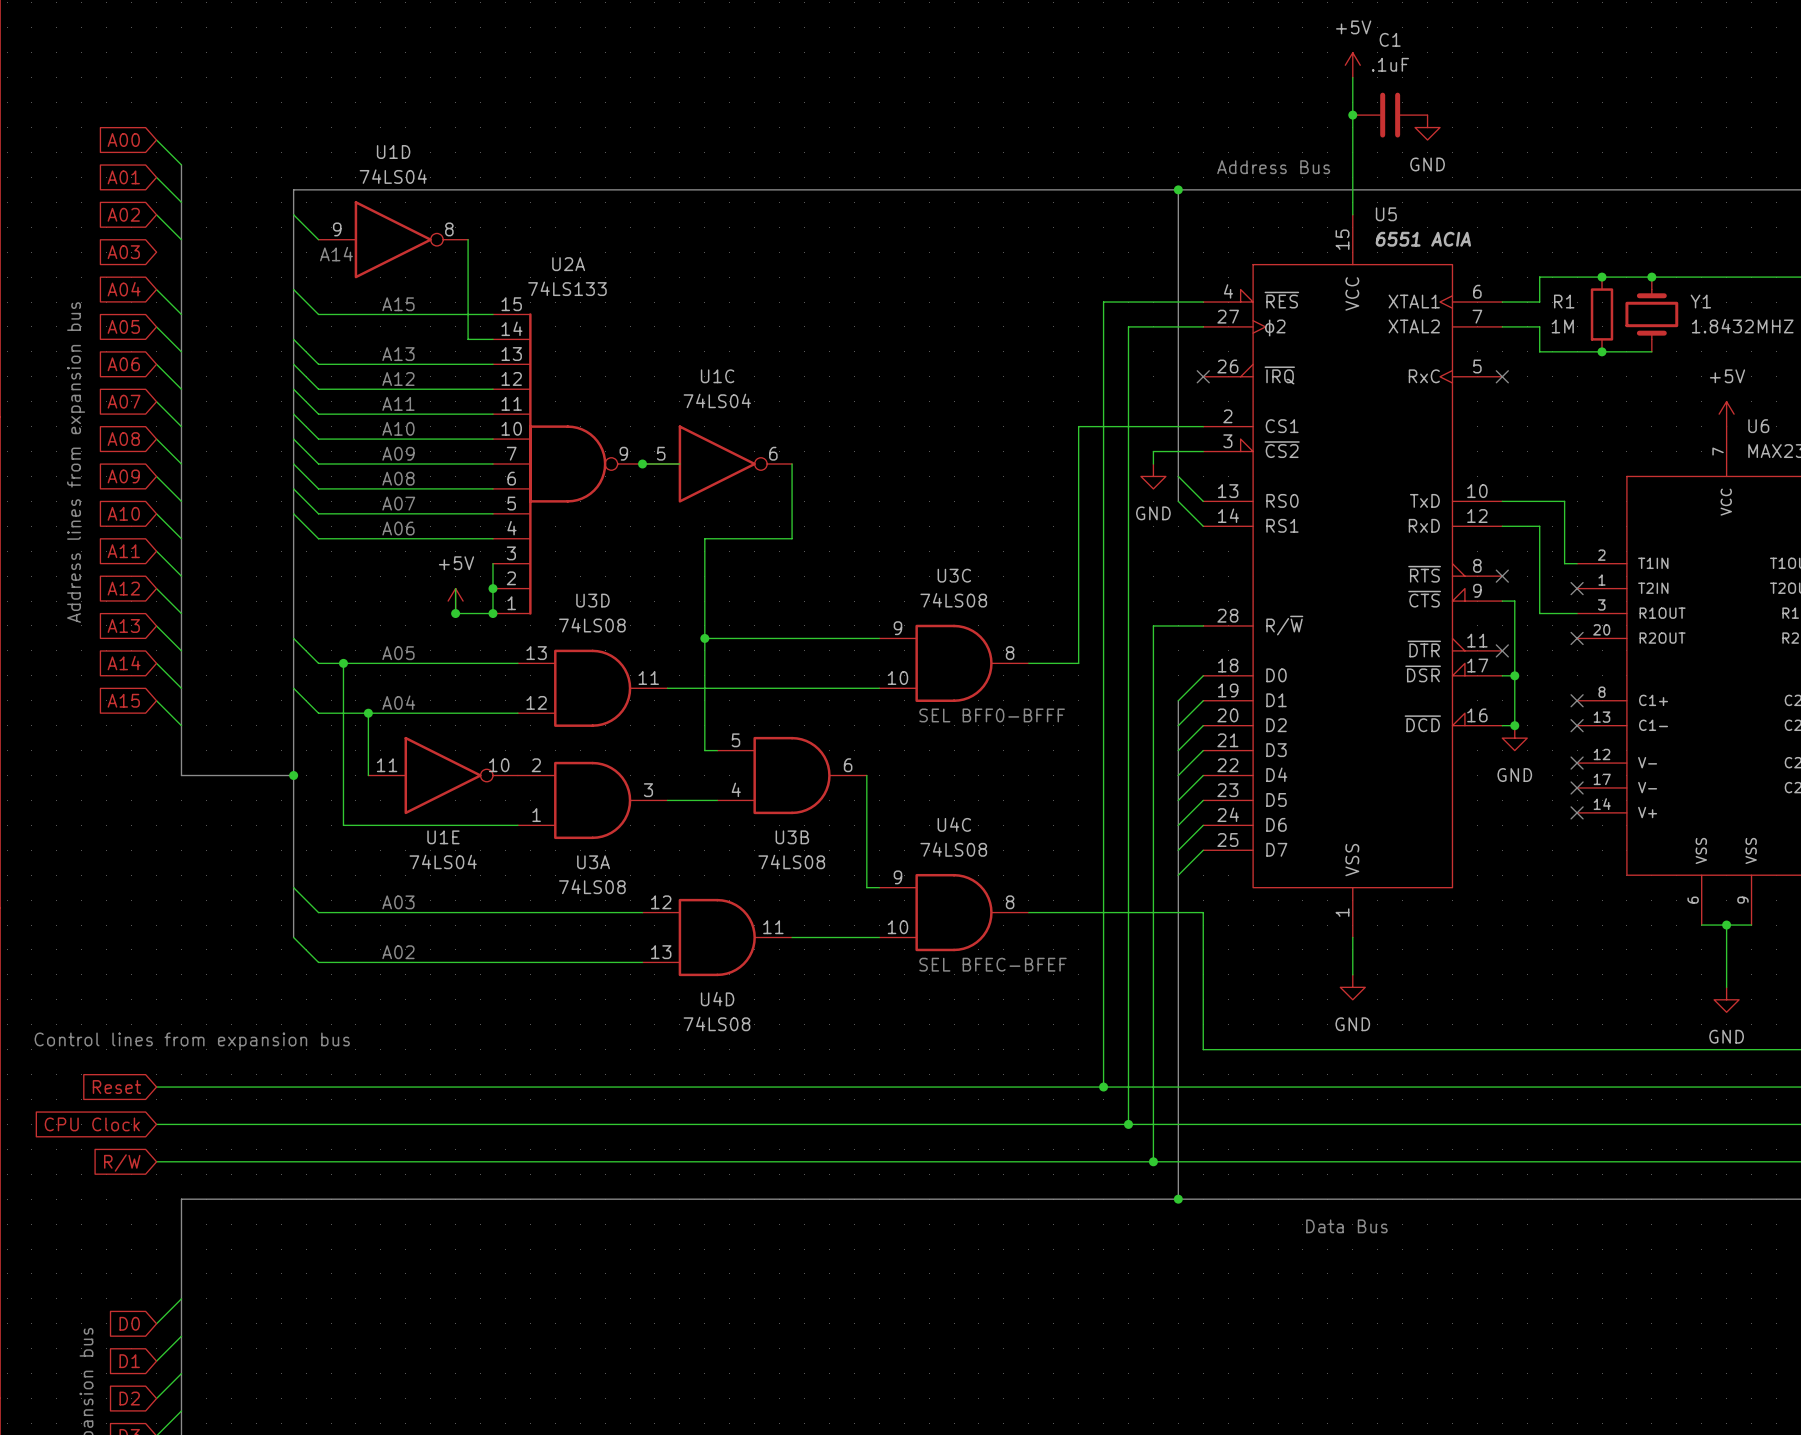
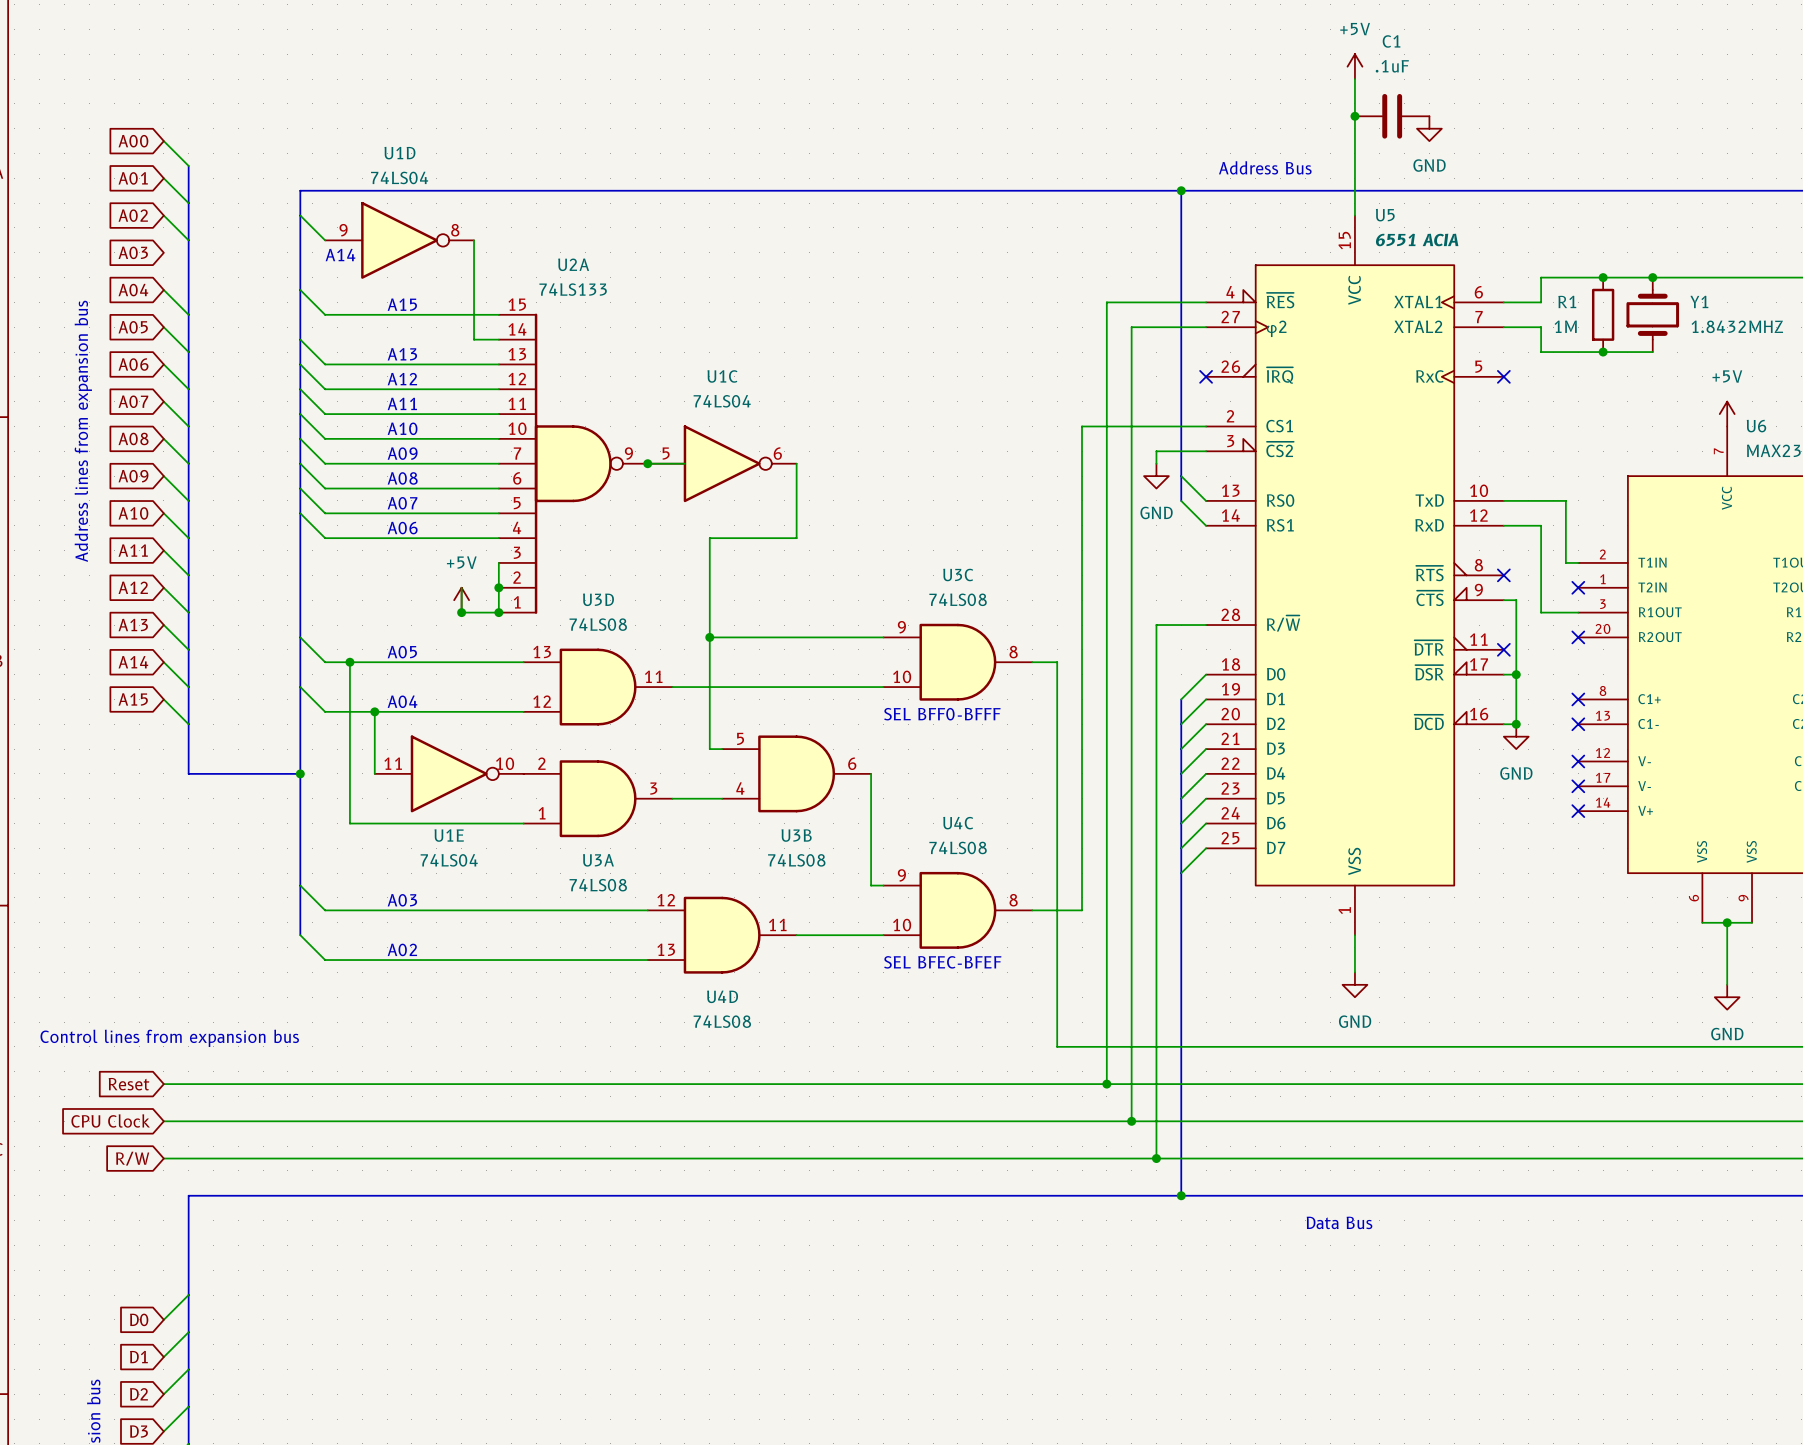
wire: (1053, 663) (1078, 663) -> (1082, 910) (1082, 662)
text position: SEL BFF0-BFFF (992, 715) -> SEL BFF0-BFFF (942, 714)
wire: (1078, 912) (1203, 912) (1203, 1049) -> (1057, 662) (1057, 1046) (1206, 1046)
text position: SEL BFEC-BFEF (993, 964) -> SEL BFEC-BFEF (942, 962)

